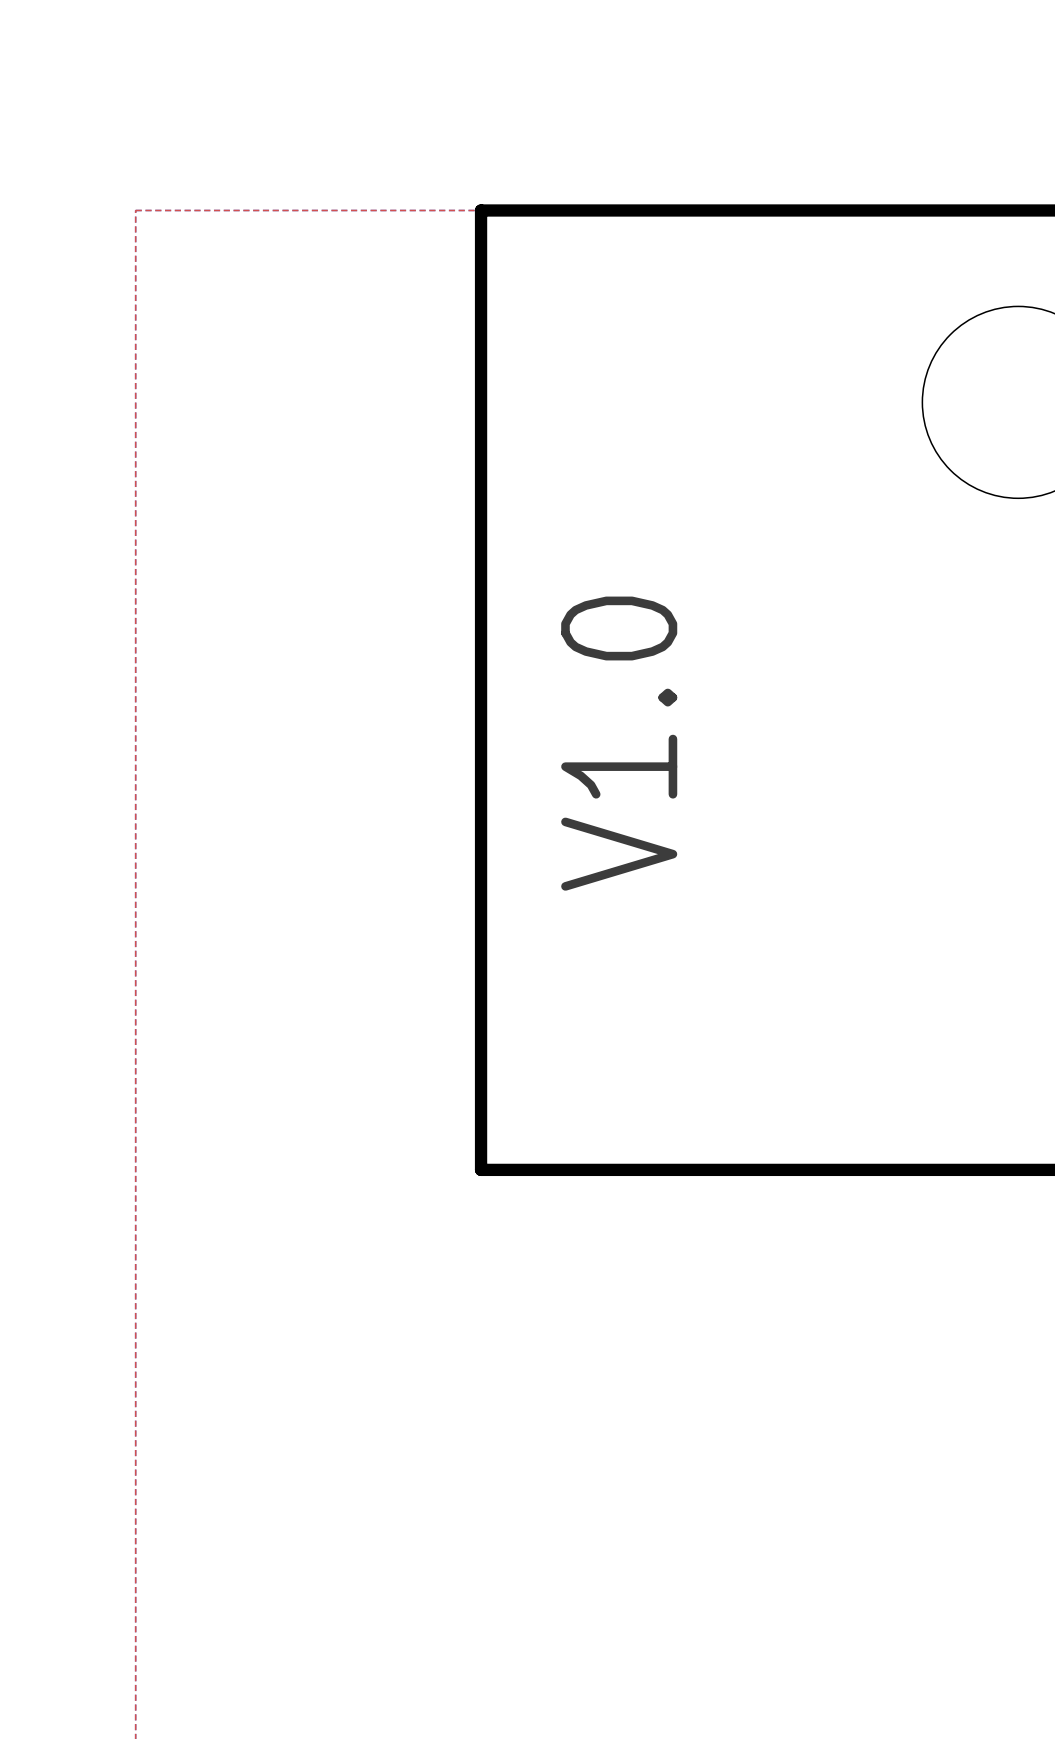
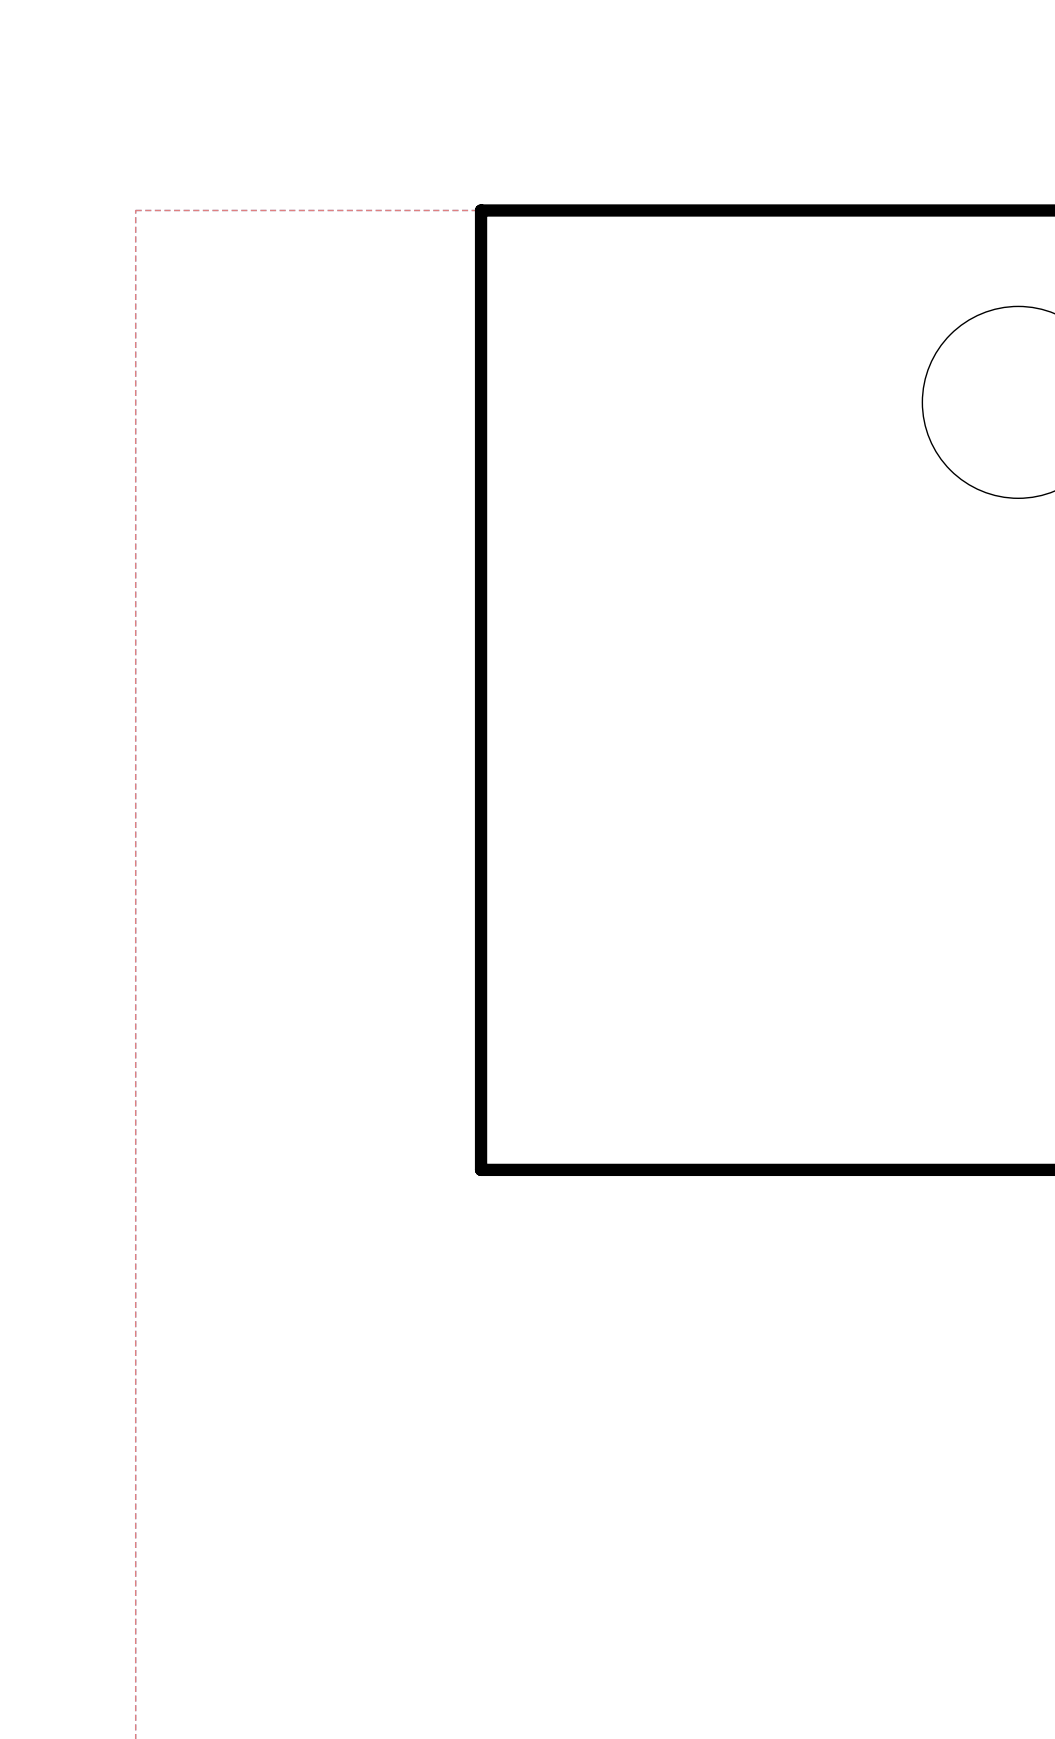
text: V1.0 (619, 743) -> none

